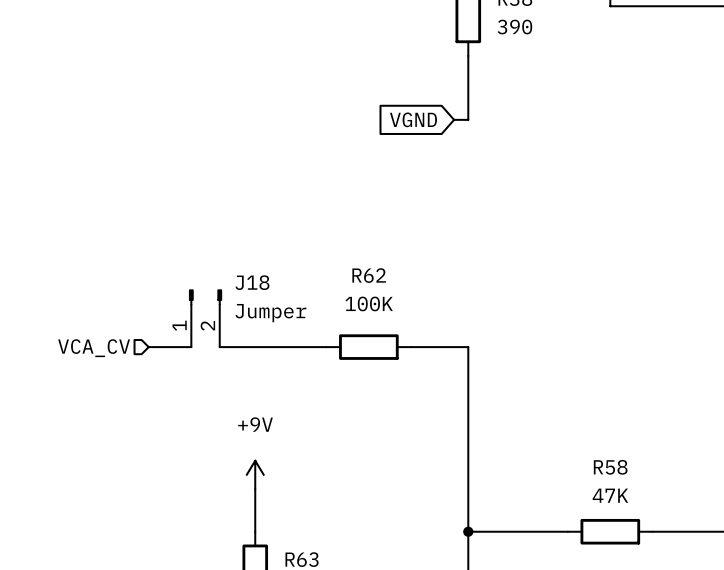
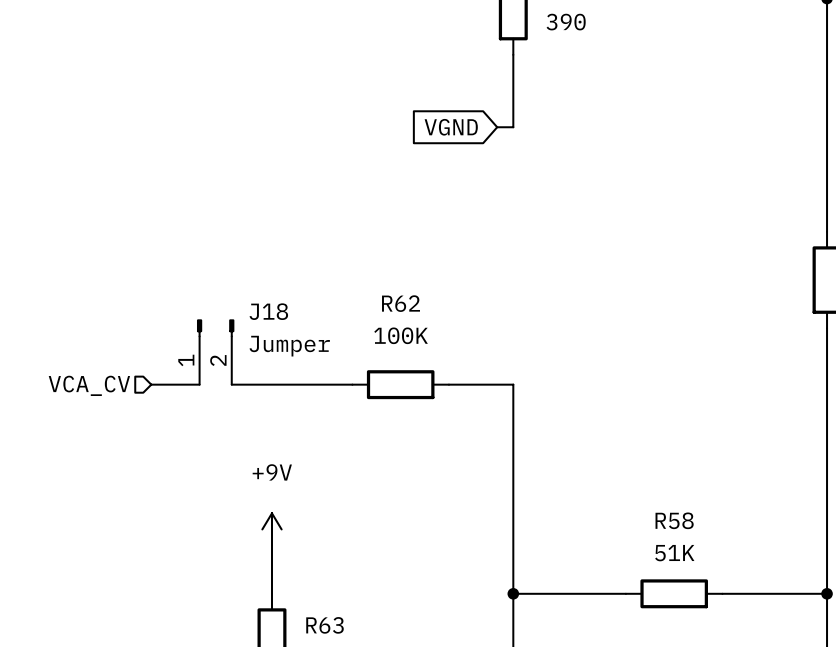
R58 value: 47K (610, 495) -> 51K (674, 553)

